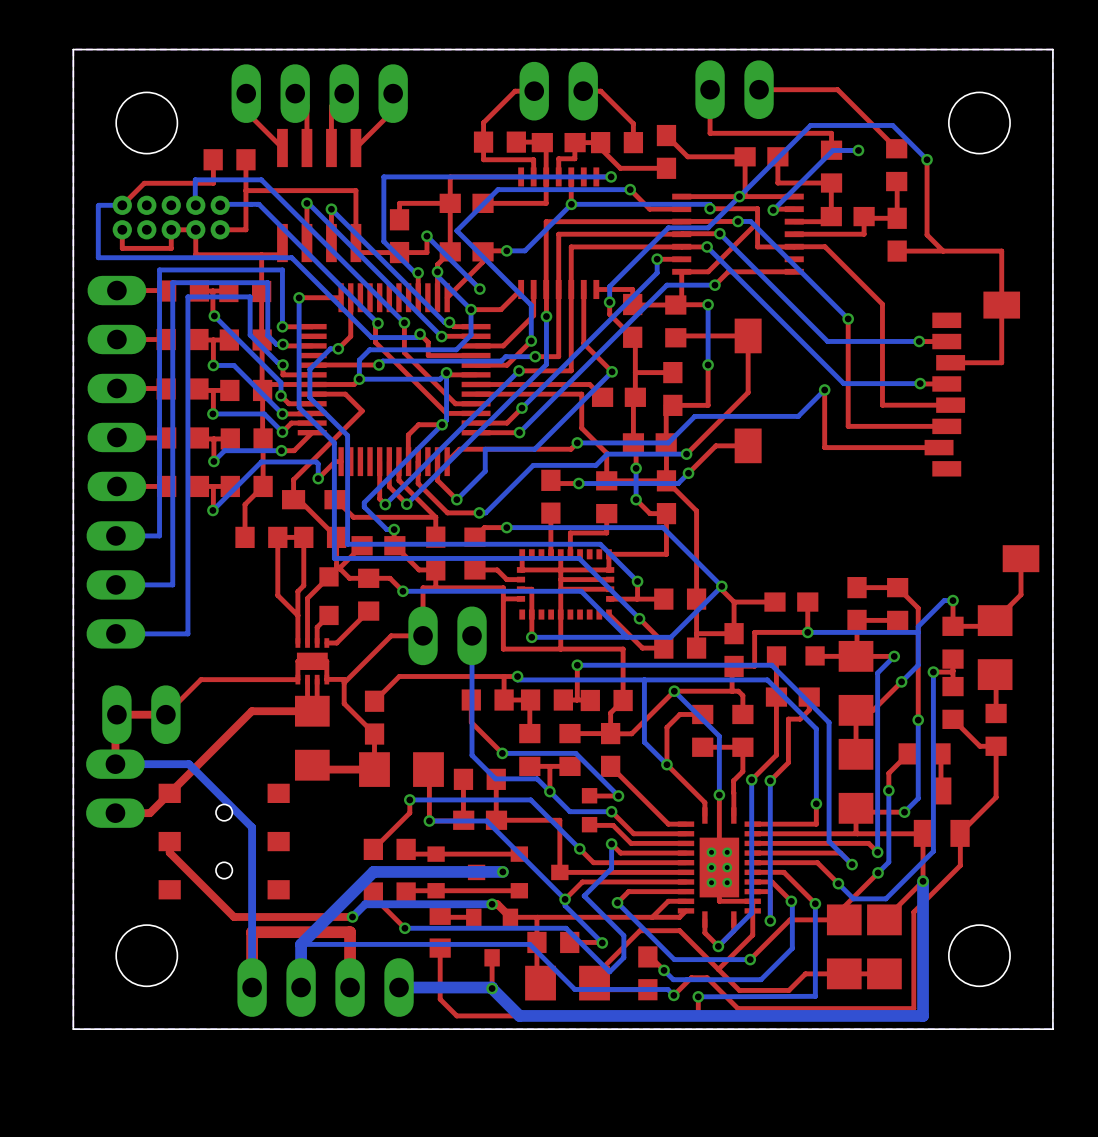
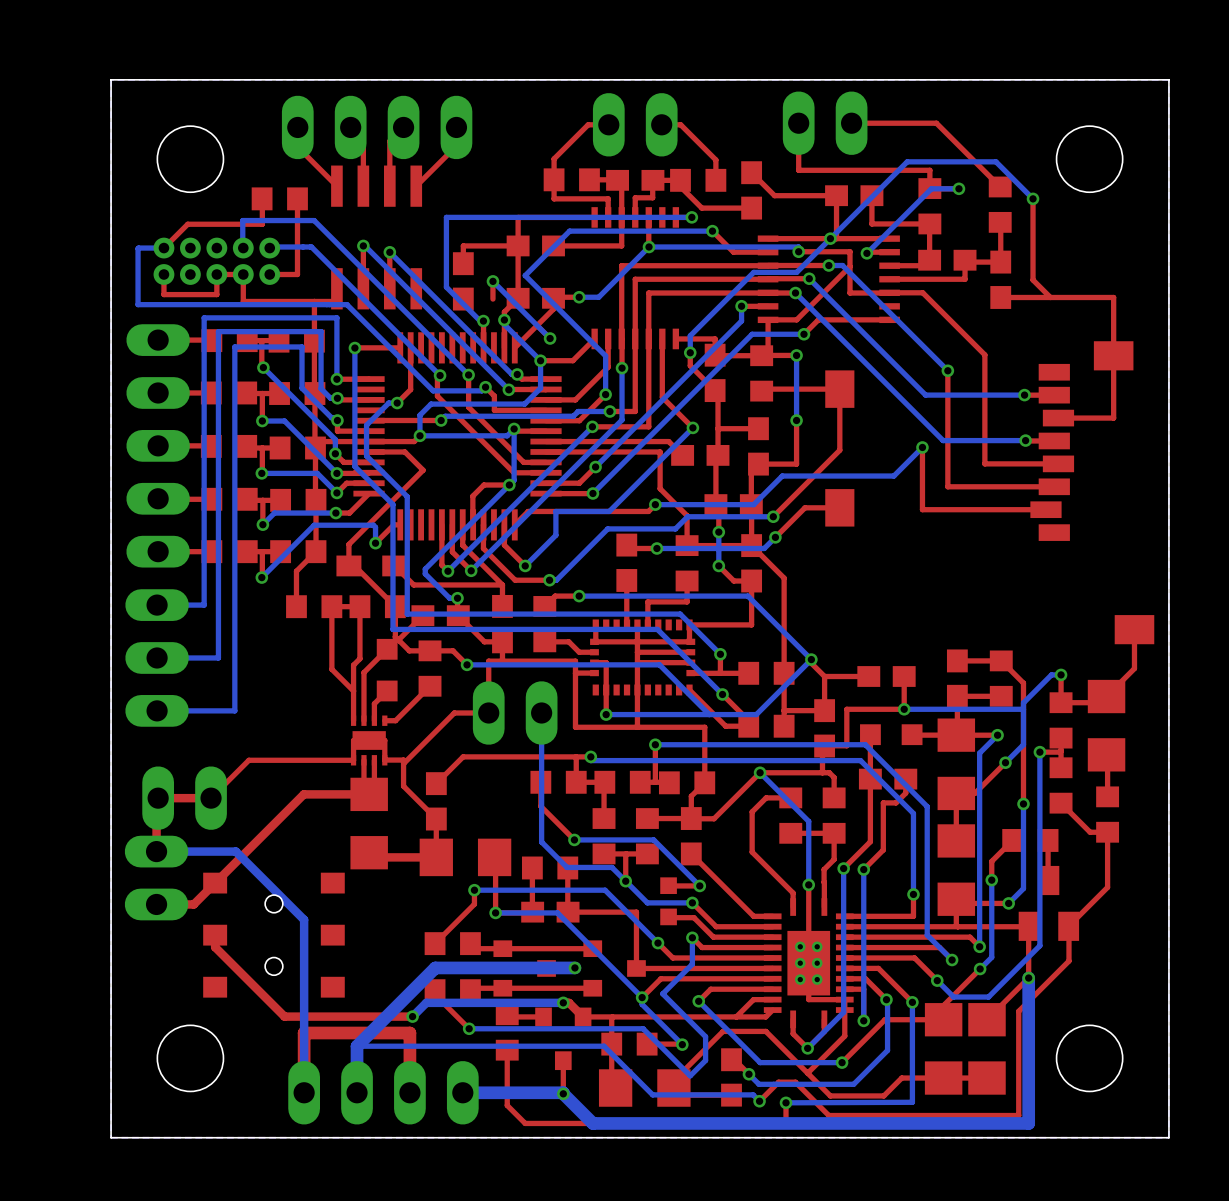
top track: (245, 190) (355, 190) (355, 252) (426, 252) -> none
bottom track: (644, 679) (644, 742) (666, 764) -> none
via: (666, 764) -> none

